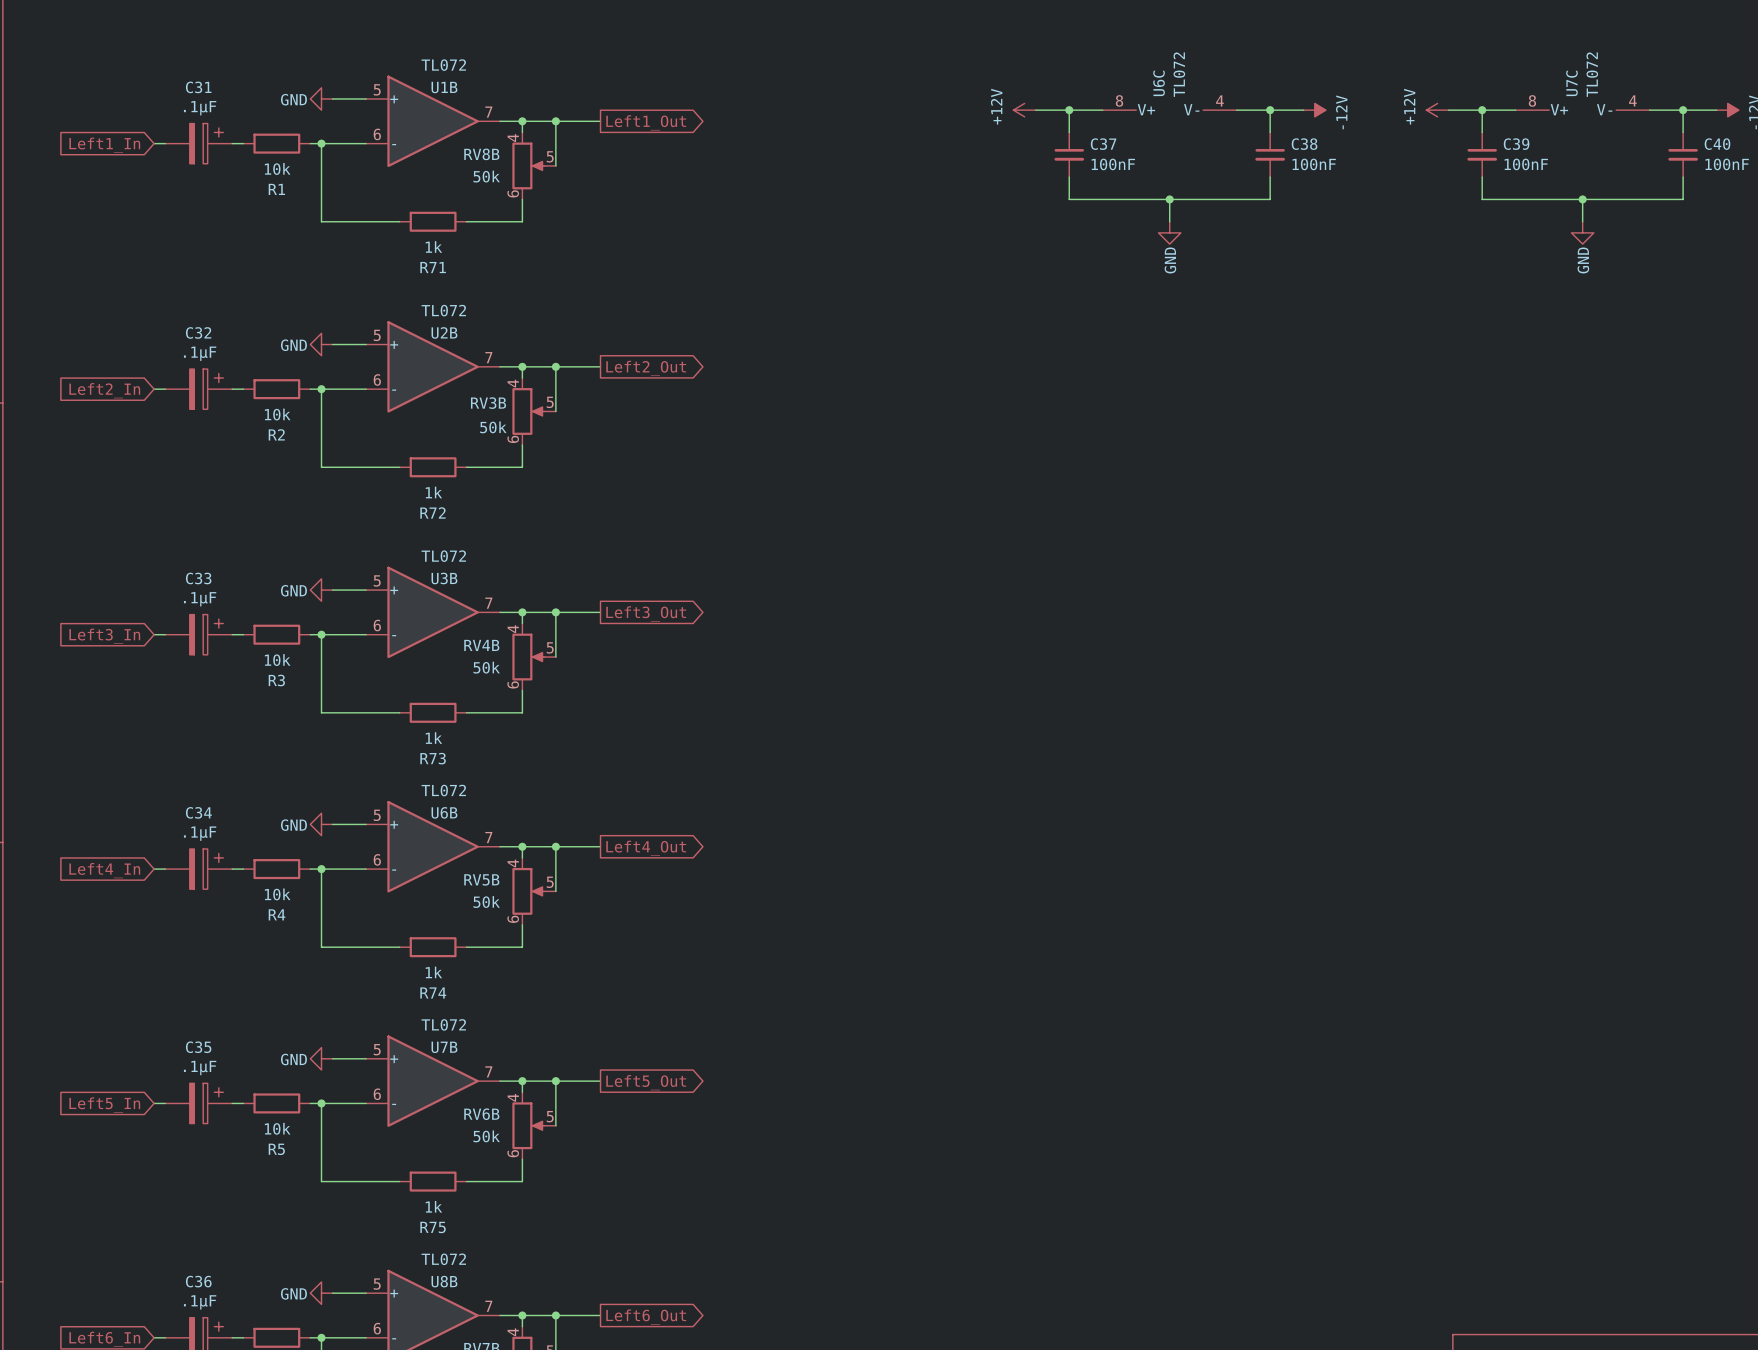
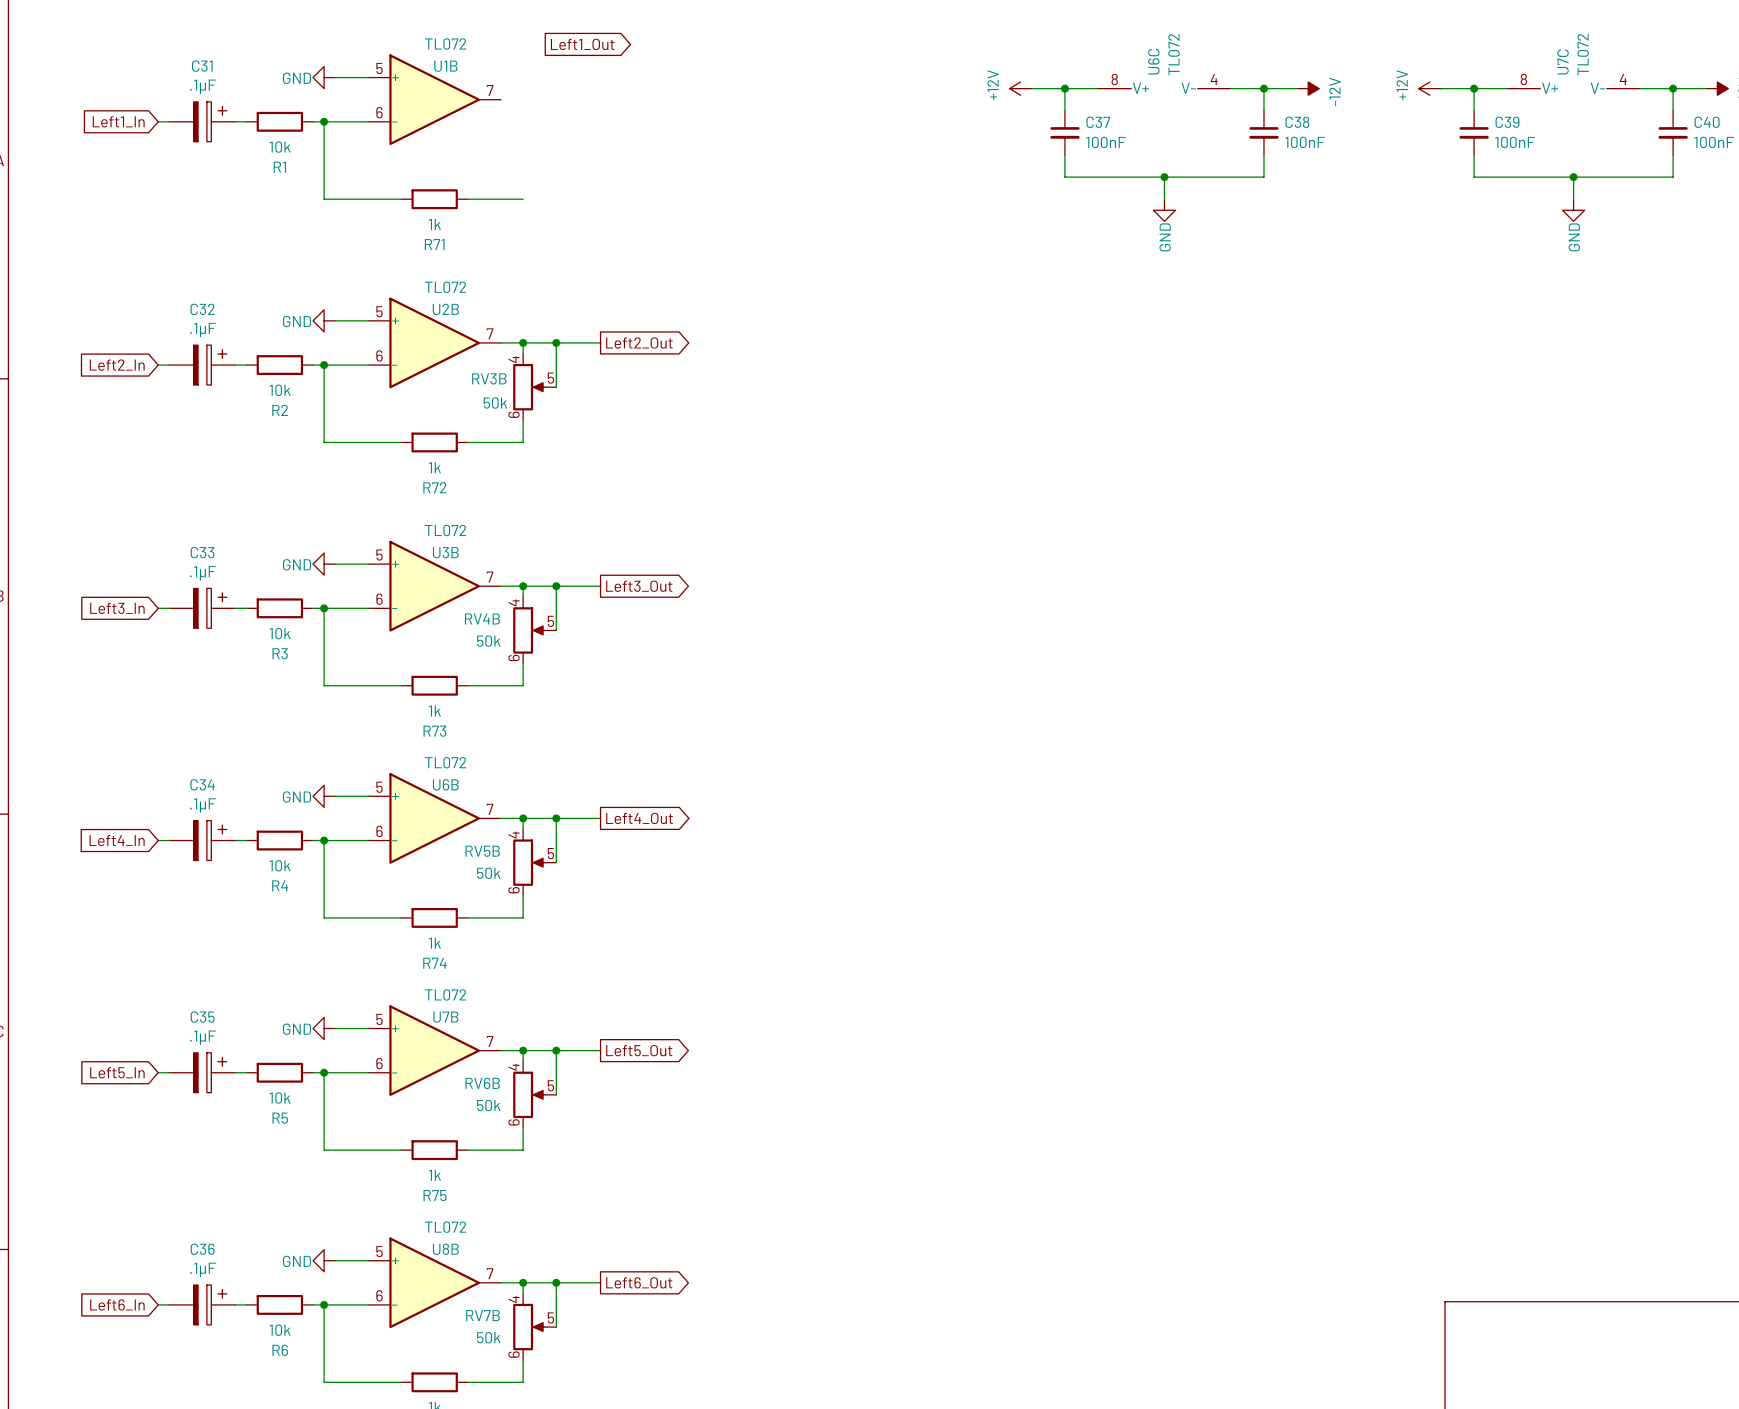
wire: (500, 121) (600, 121) -> none
wire: (522, 121) (522, 132) -> none
junction: (522, 121) -> none
wire: (555, 121) (555, 165) -> none
junction: (555, 121) -> none
global label position: Left1_Out (646, 122) -> Left1_Out (582, 44)
RV8B: 50k (534, 165) -> none
wire: (522, 199) (522, 221) -> none

